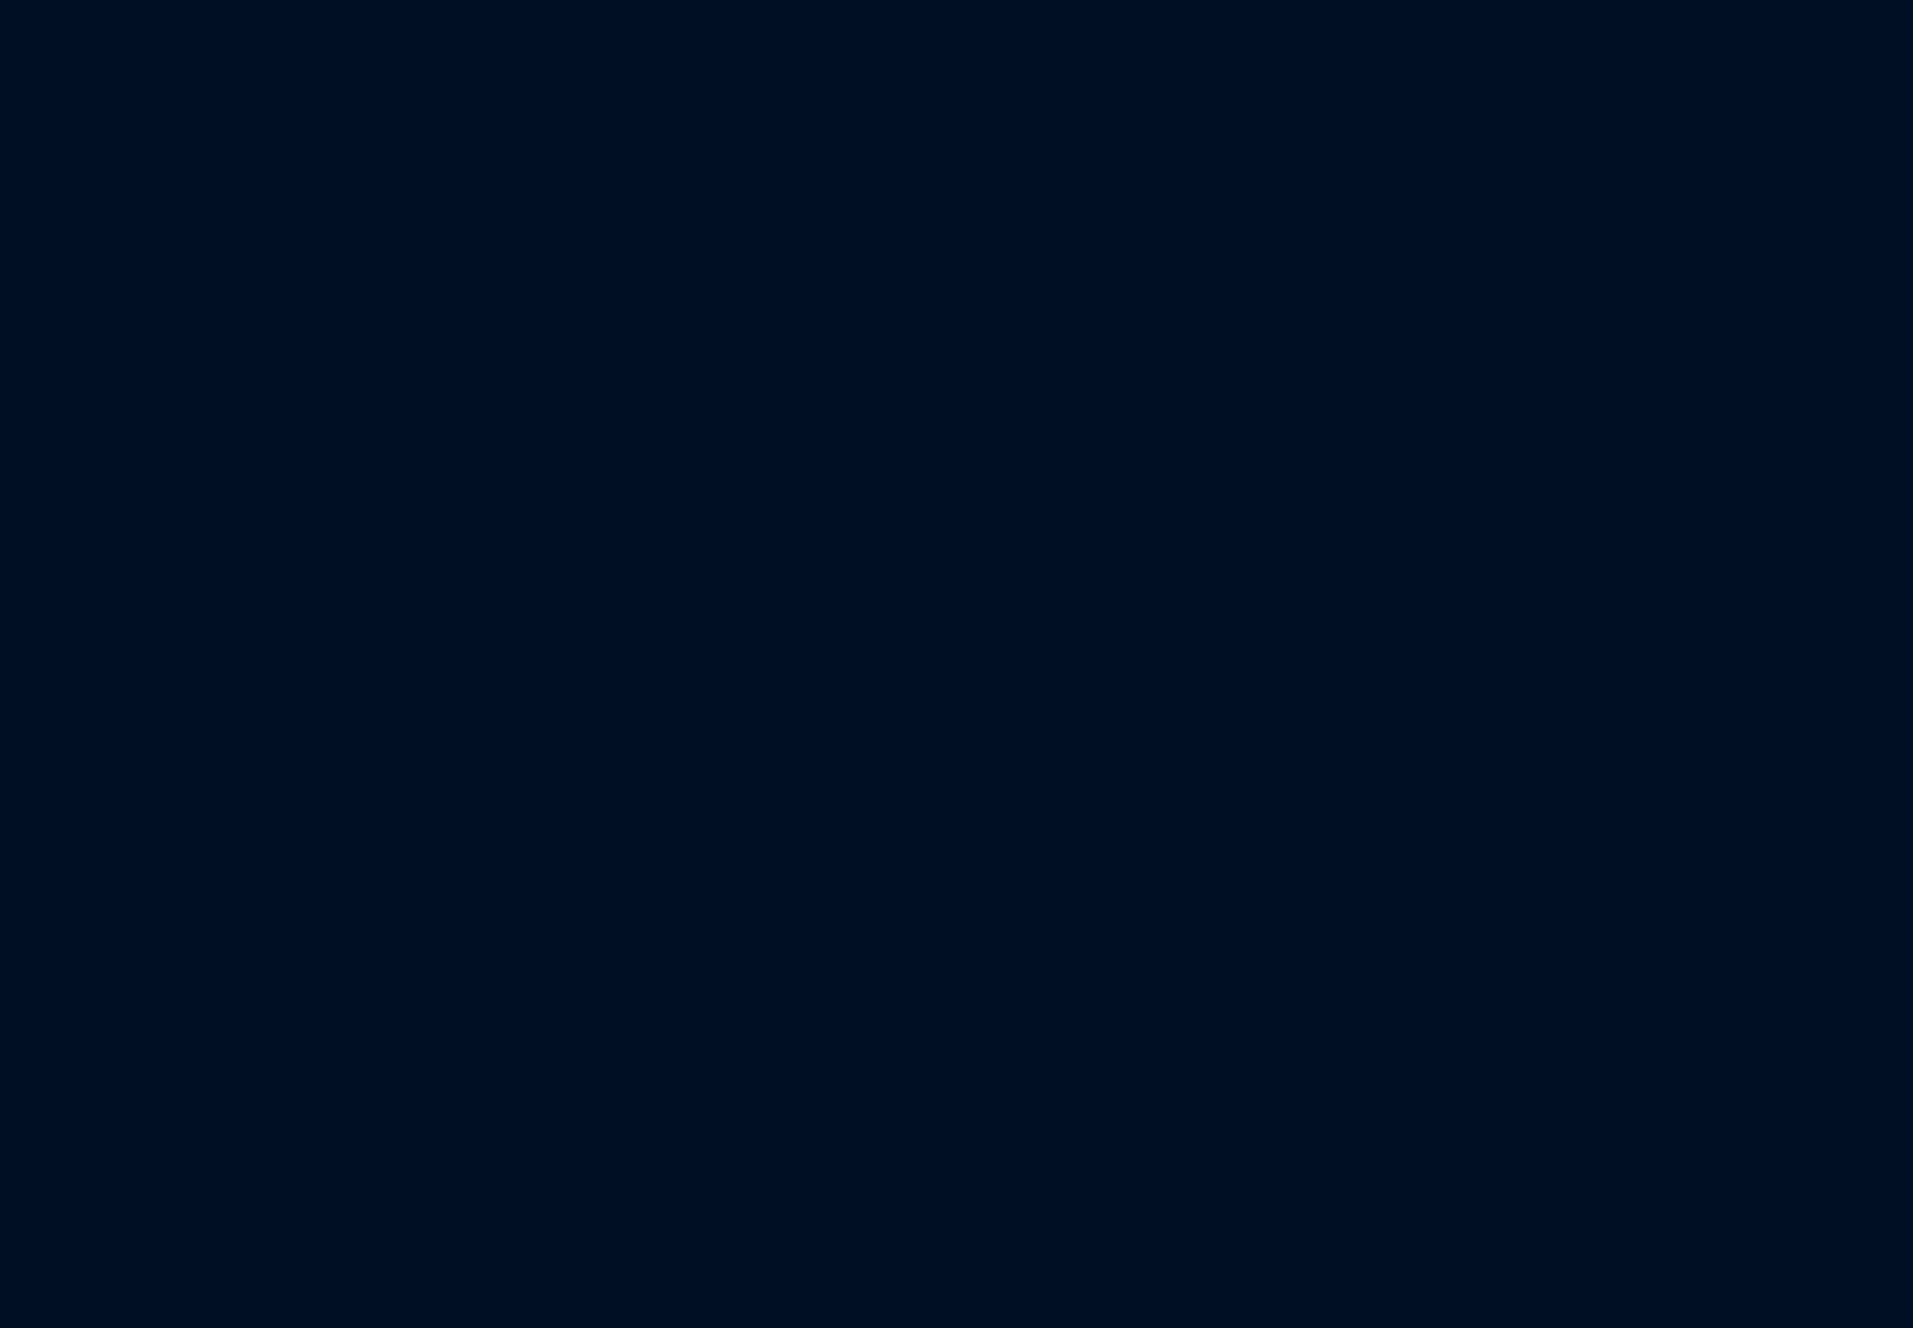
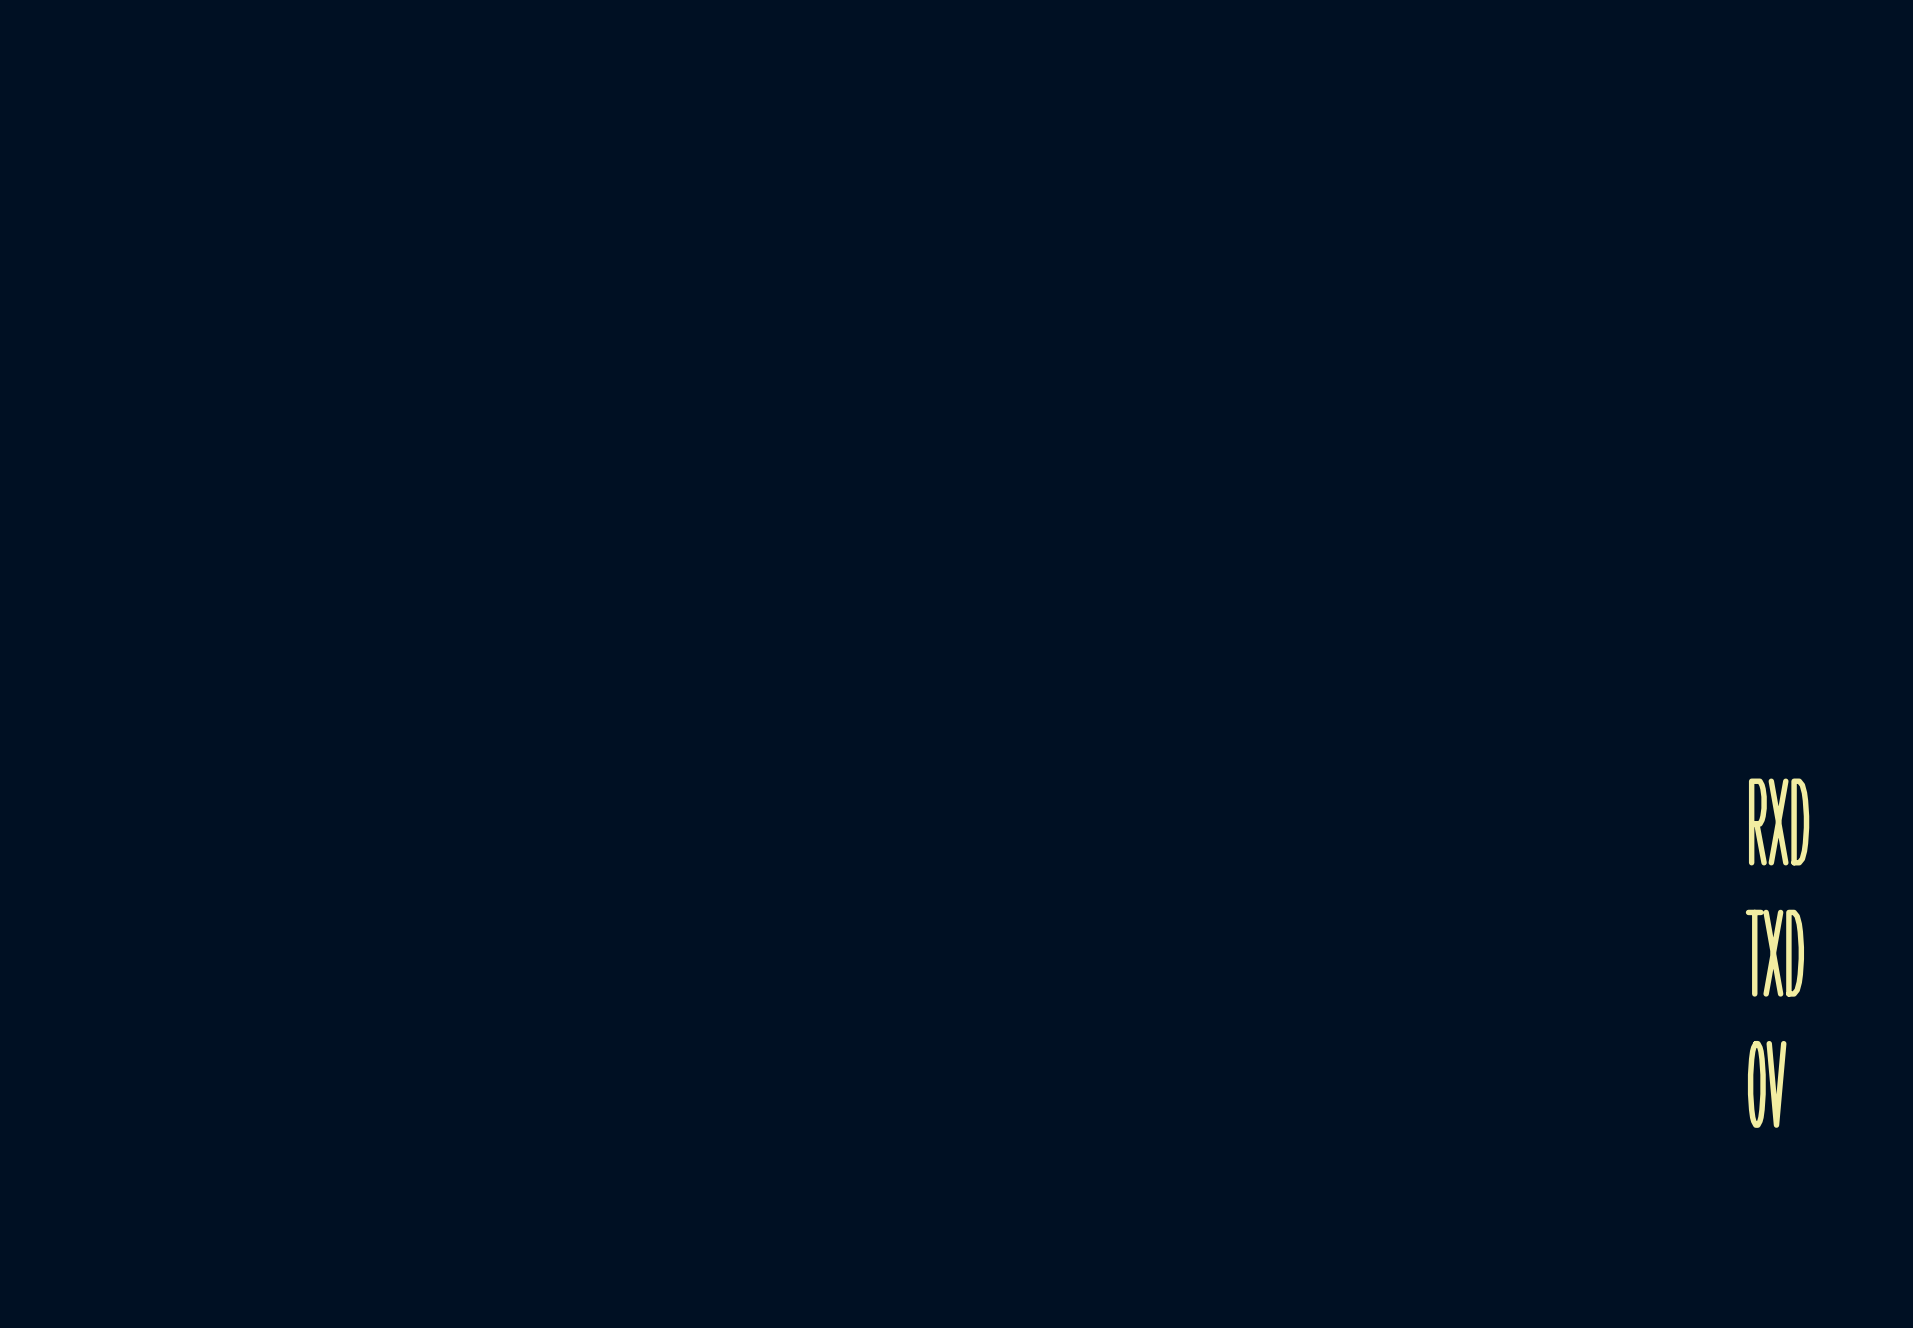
text: none -> RXD (1779, 821)
text: none -> TXD (1774, 953)
text: none -> 0V (1767, 1084)

